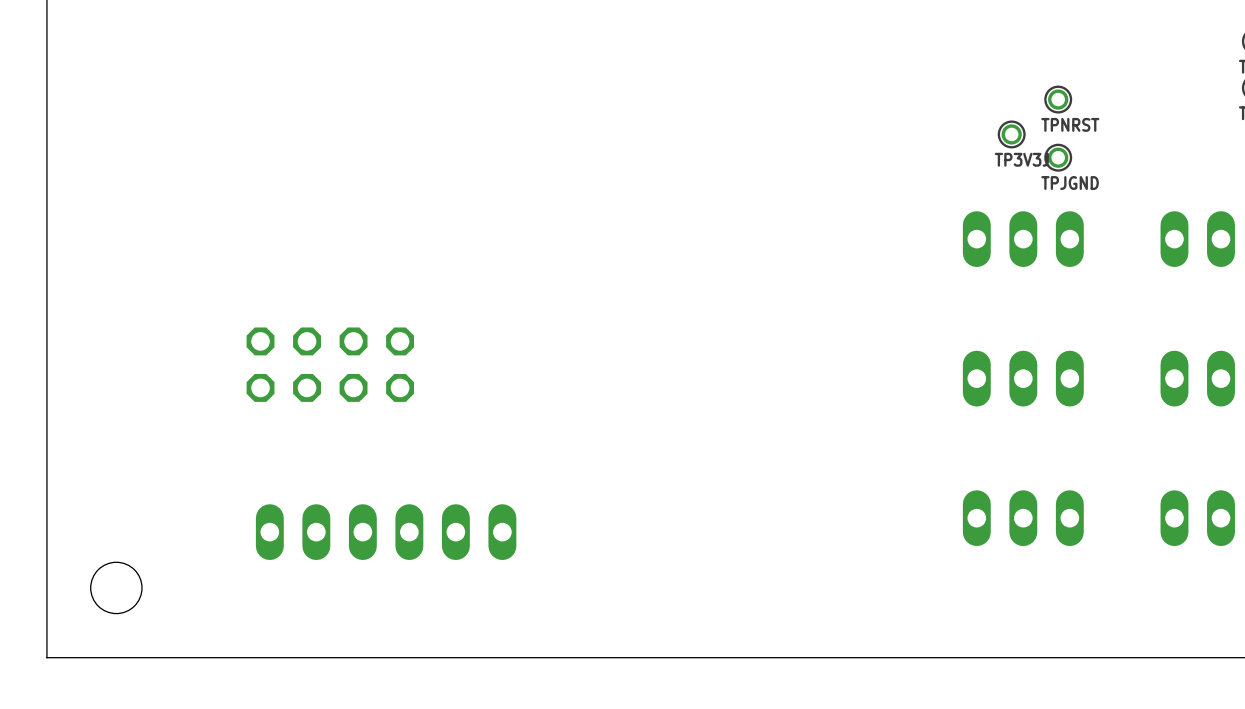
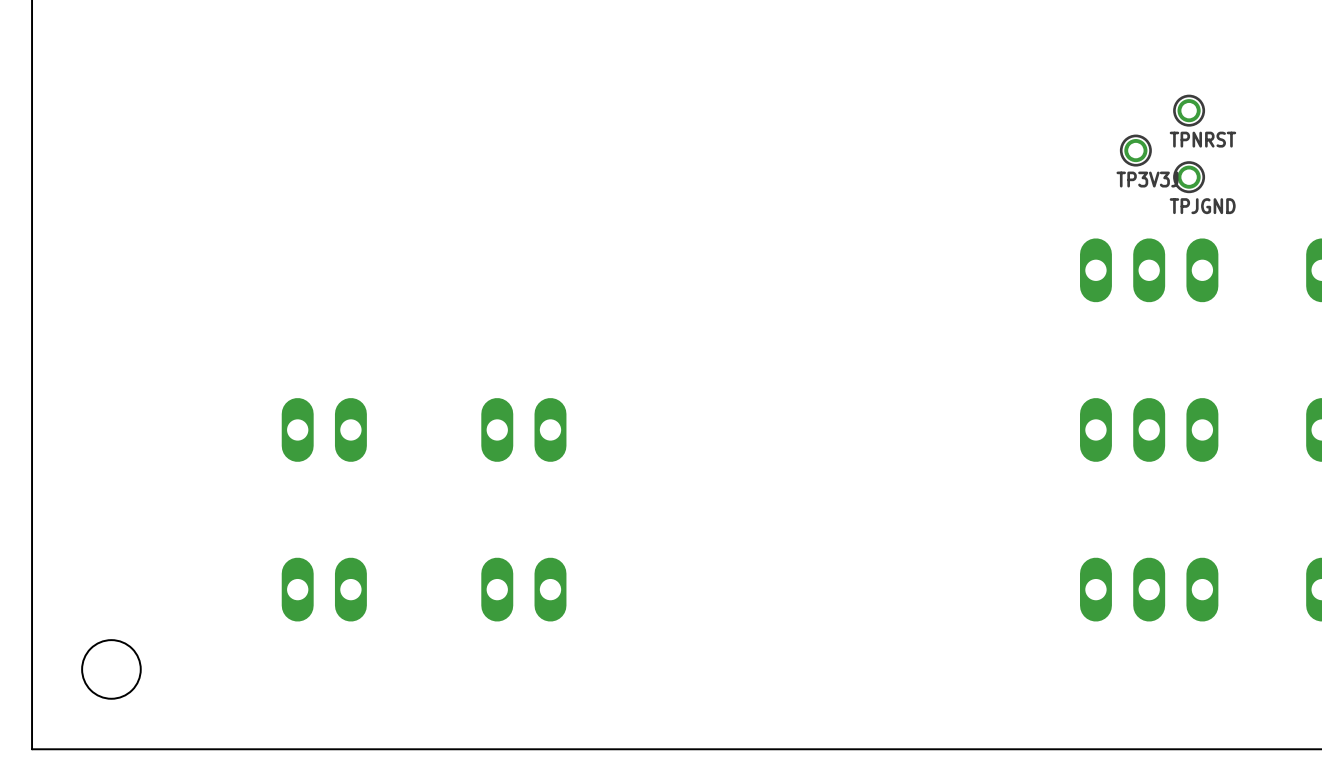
part: (330, 364) -> none
part: none -> (324, 429)
part: none -> (523, 429)
part: none -> (324, 589)
part: none -> (523, 589)
part: (386, 532) -> none

